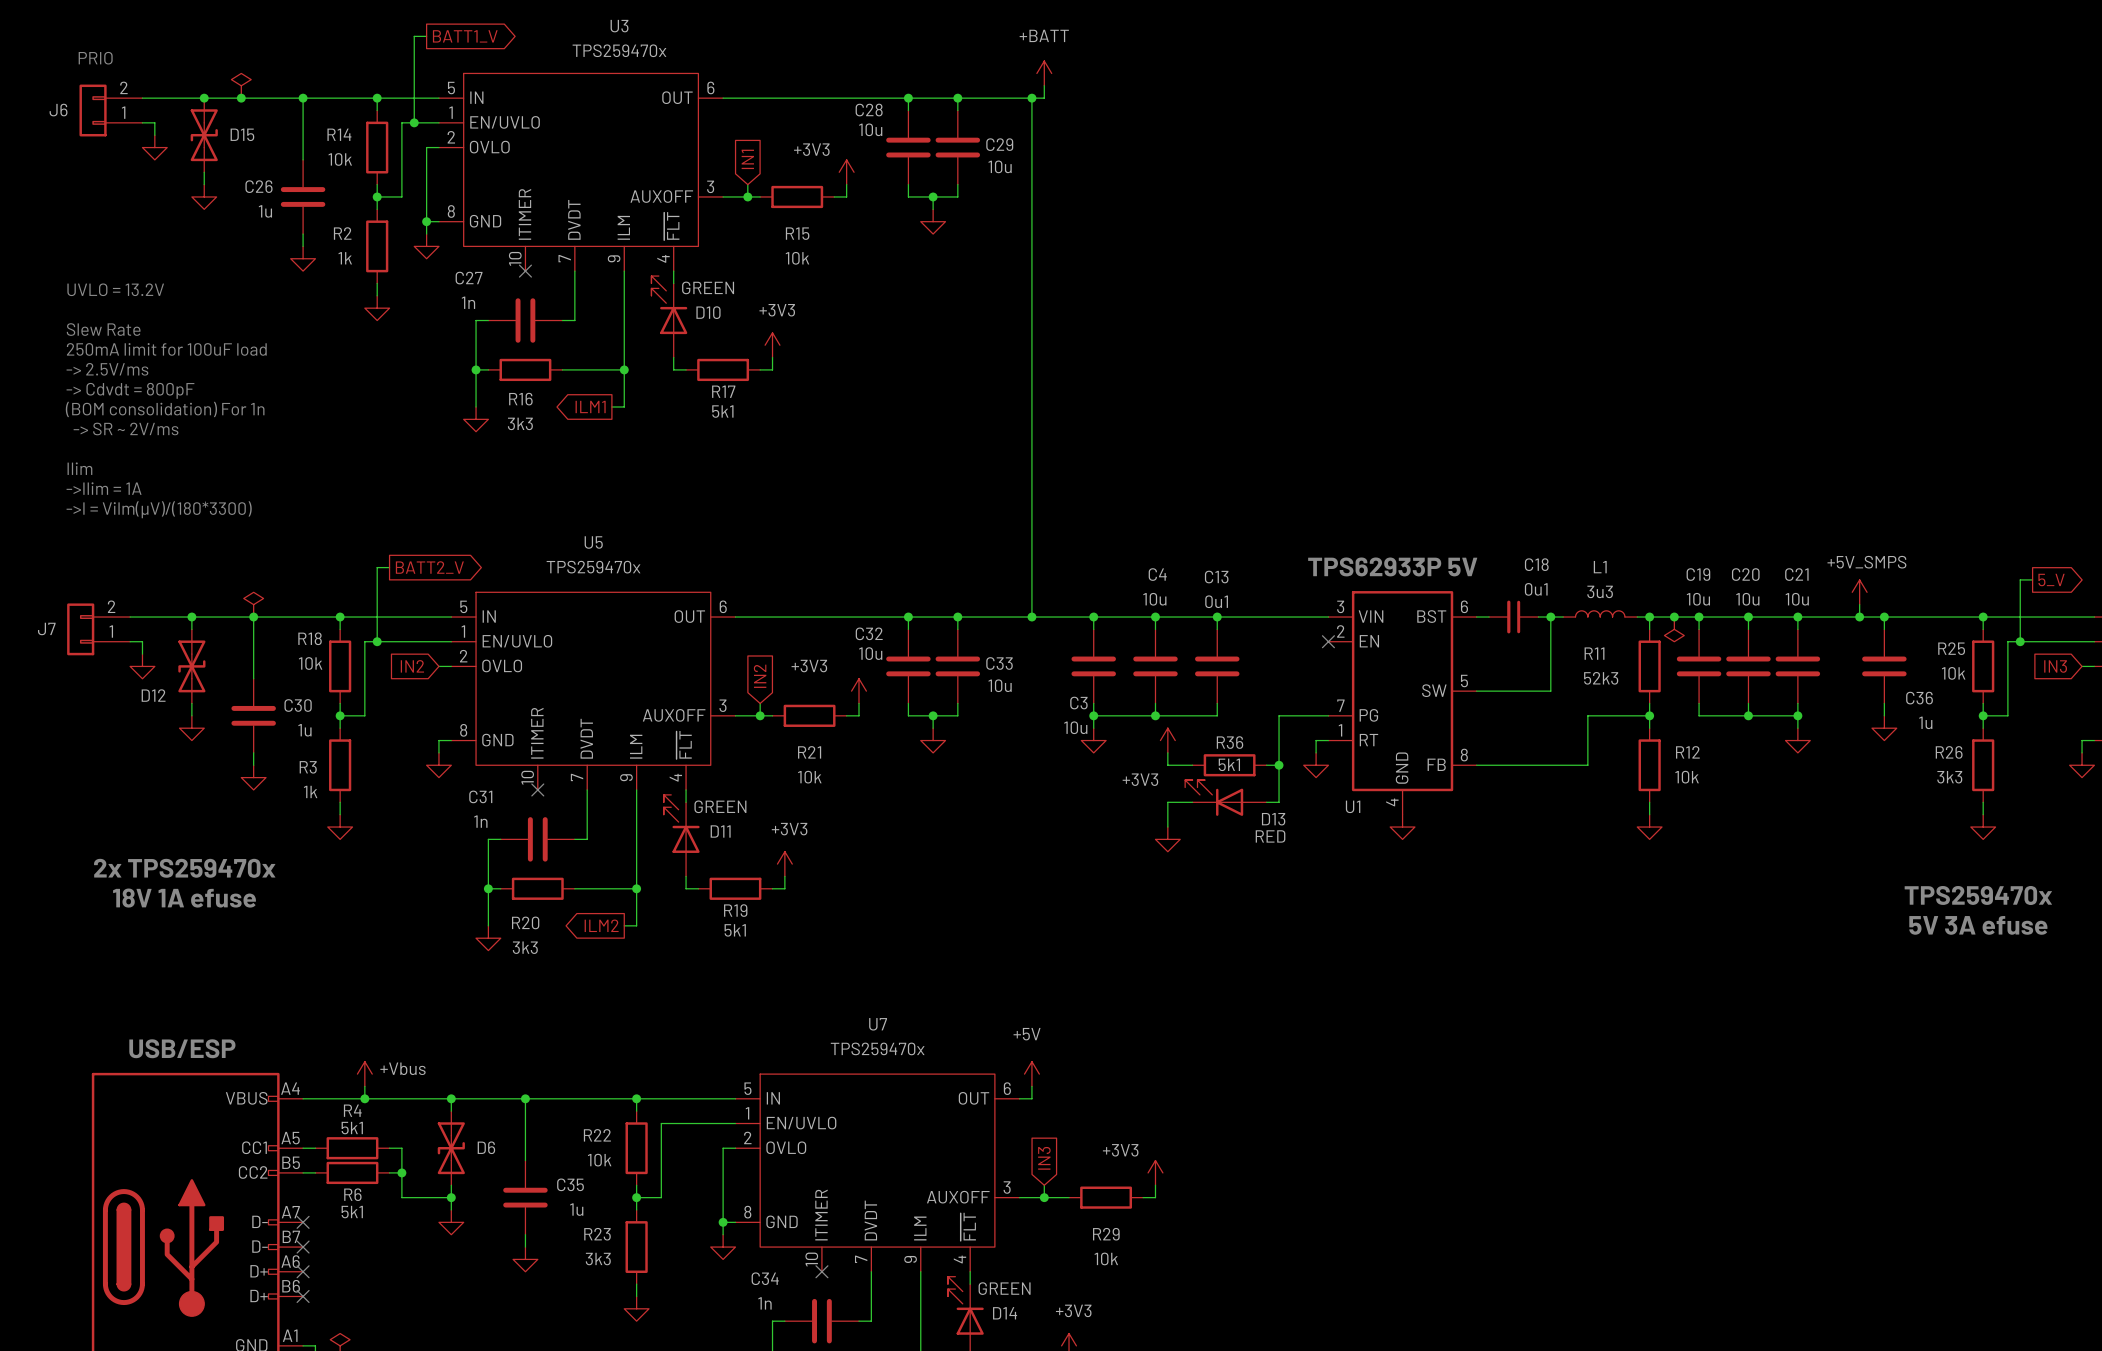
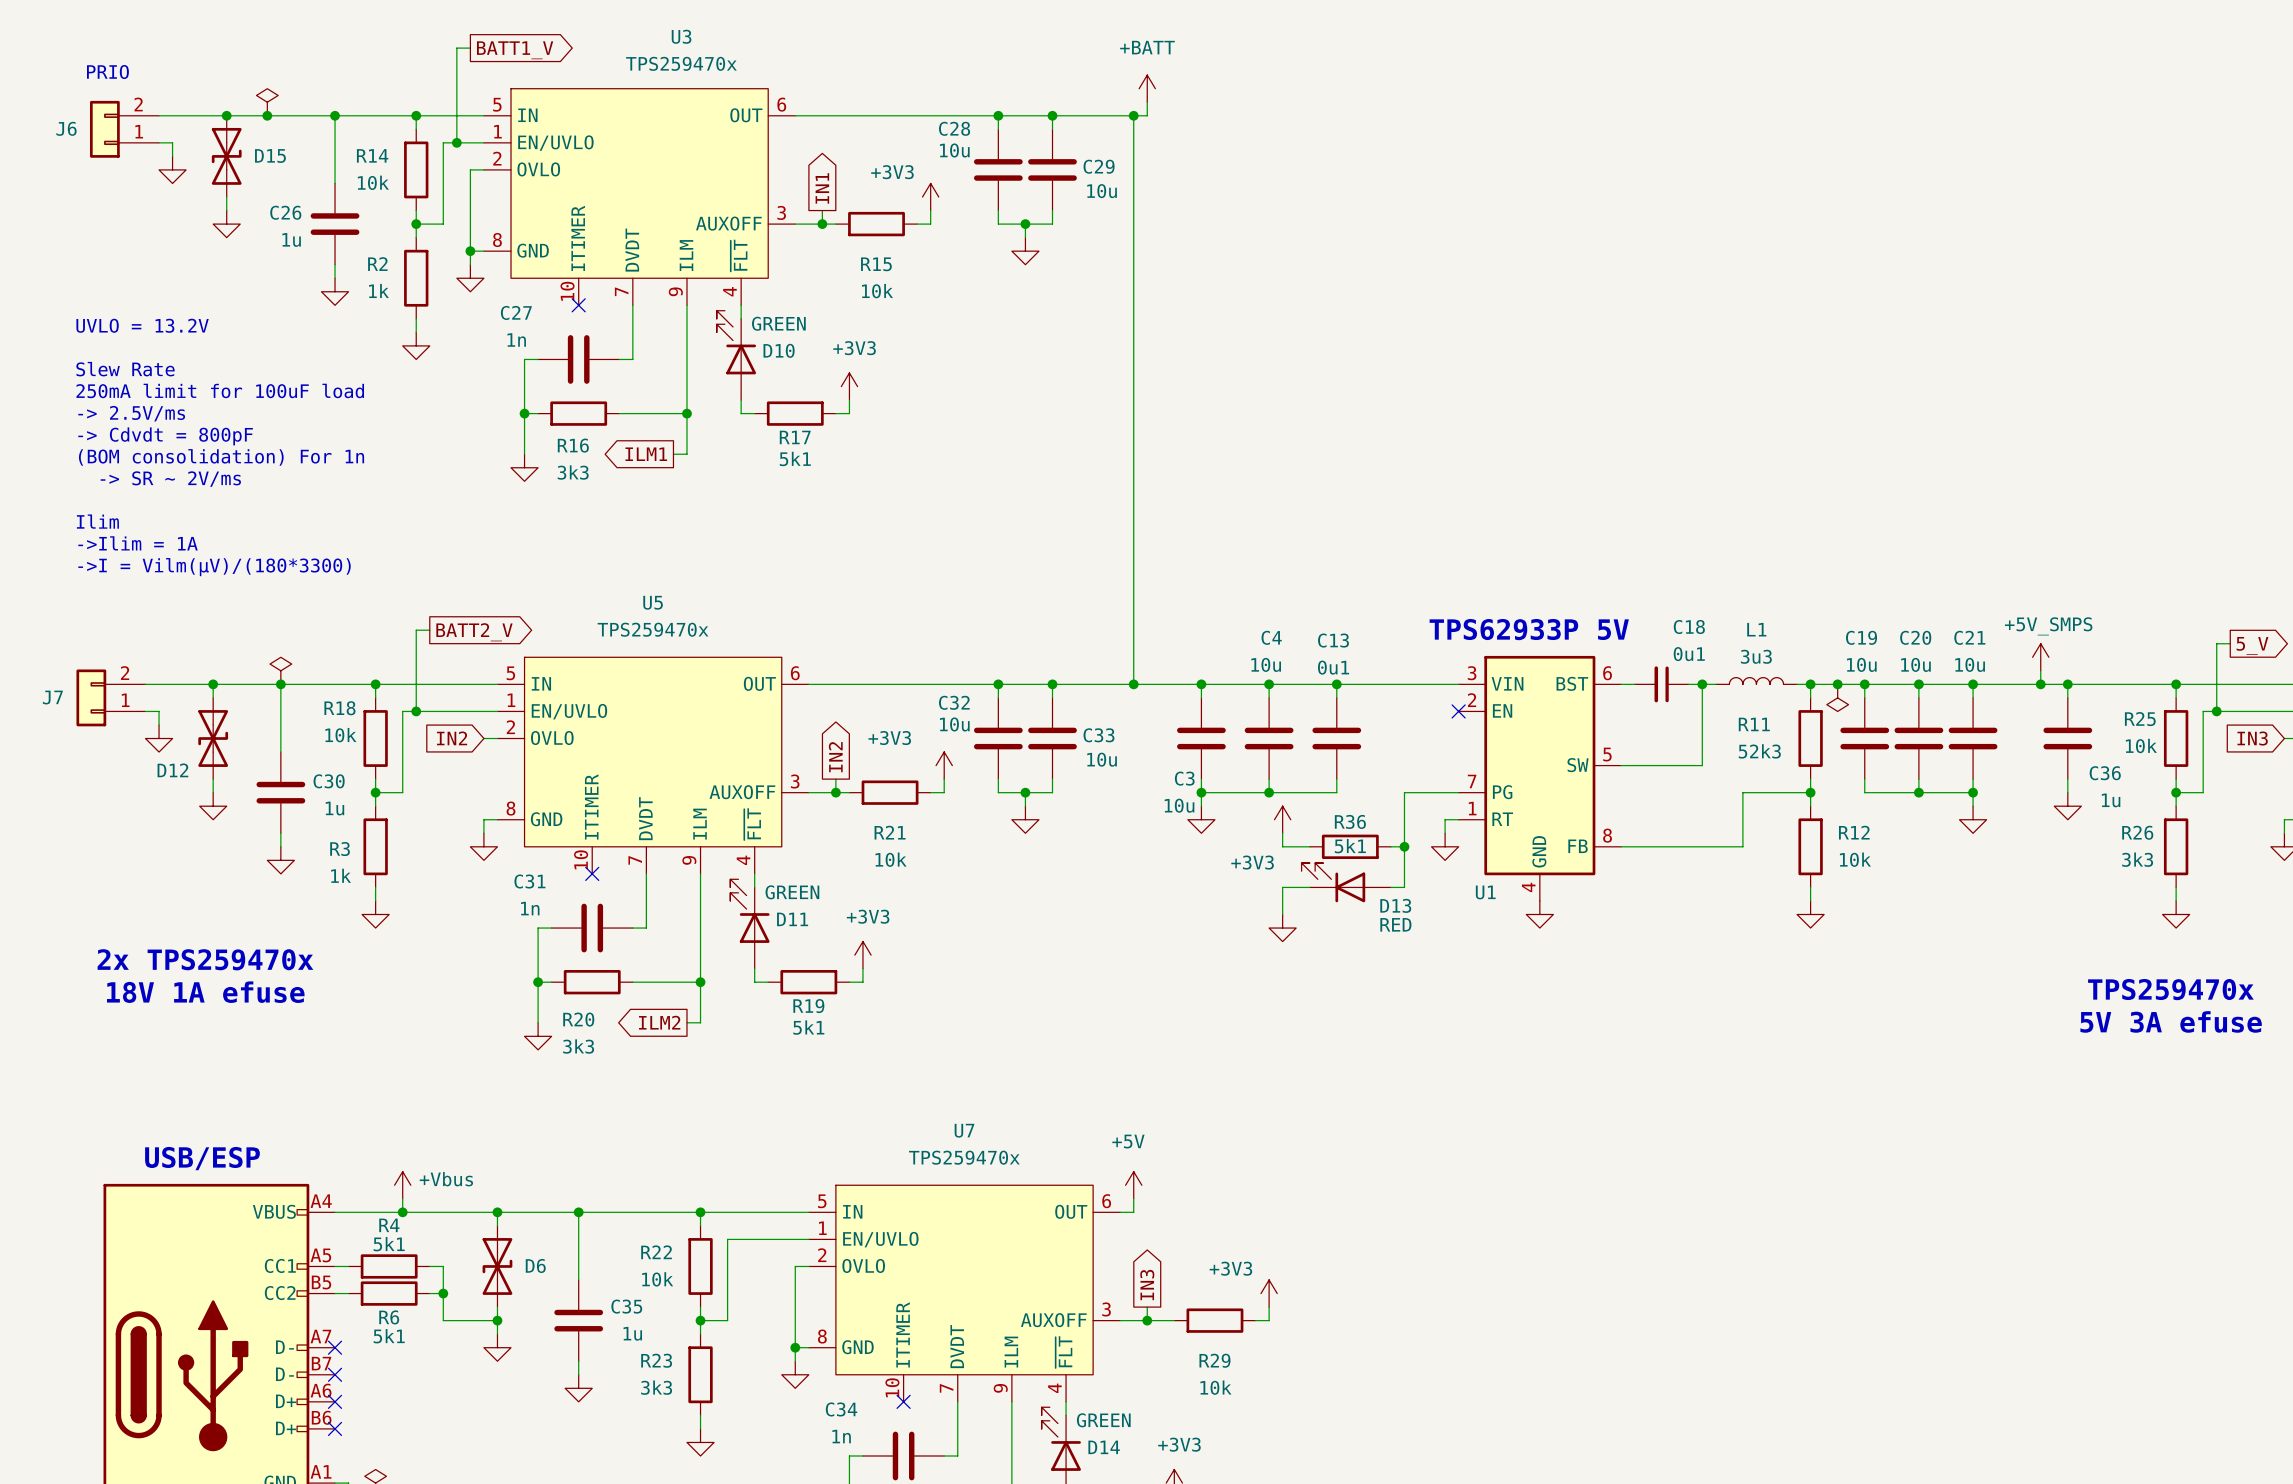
global label shape: input (747, 159) -> output (822, 188)
global label shape: input (760, 676) -> output (835, 757)
global label shape: input (1044, 1158) -> output (1147, 1285)

